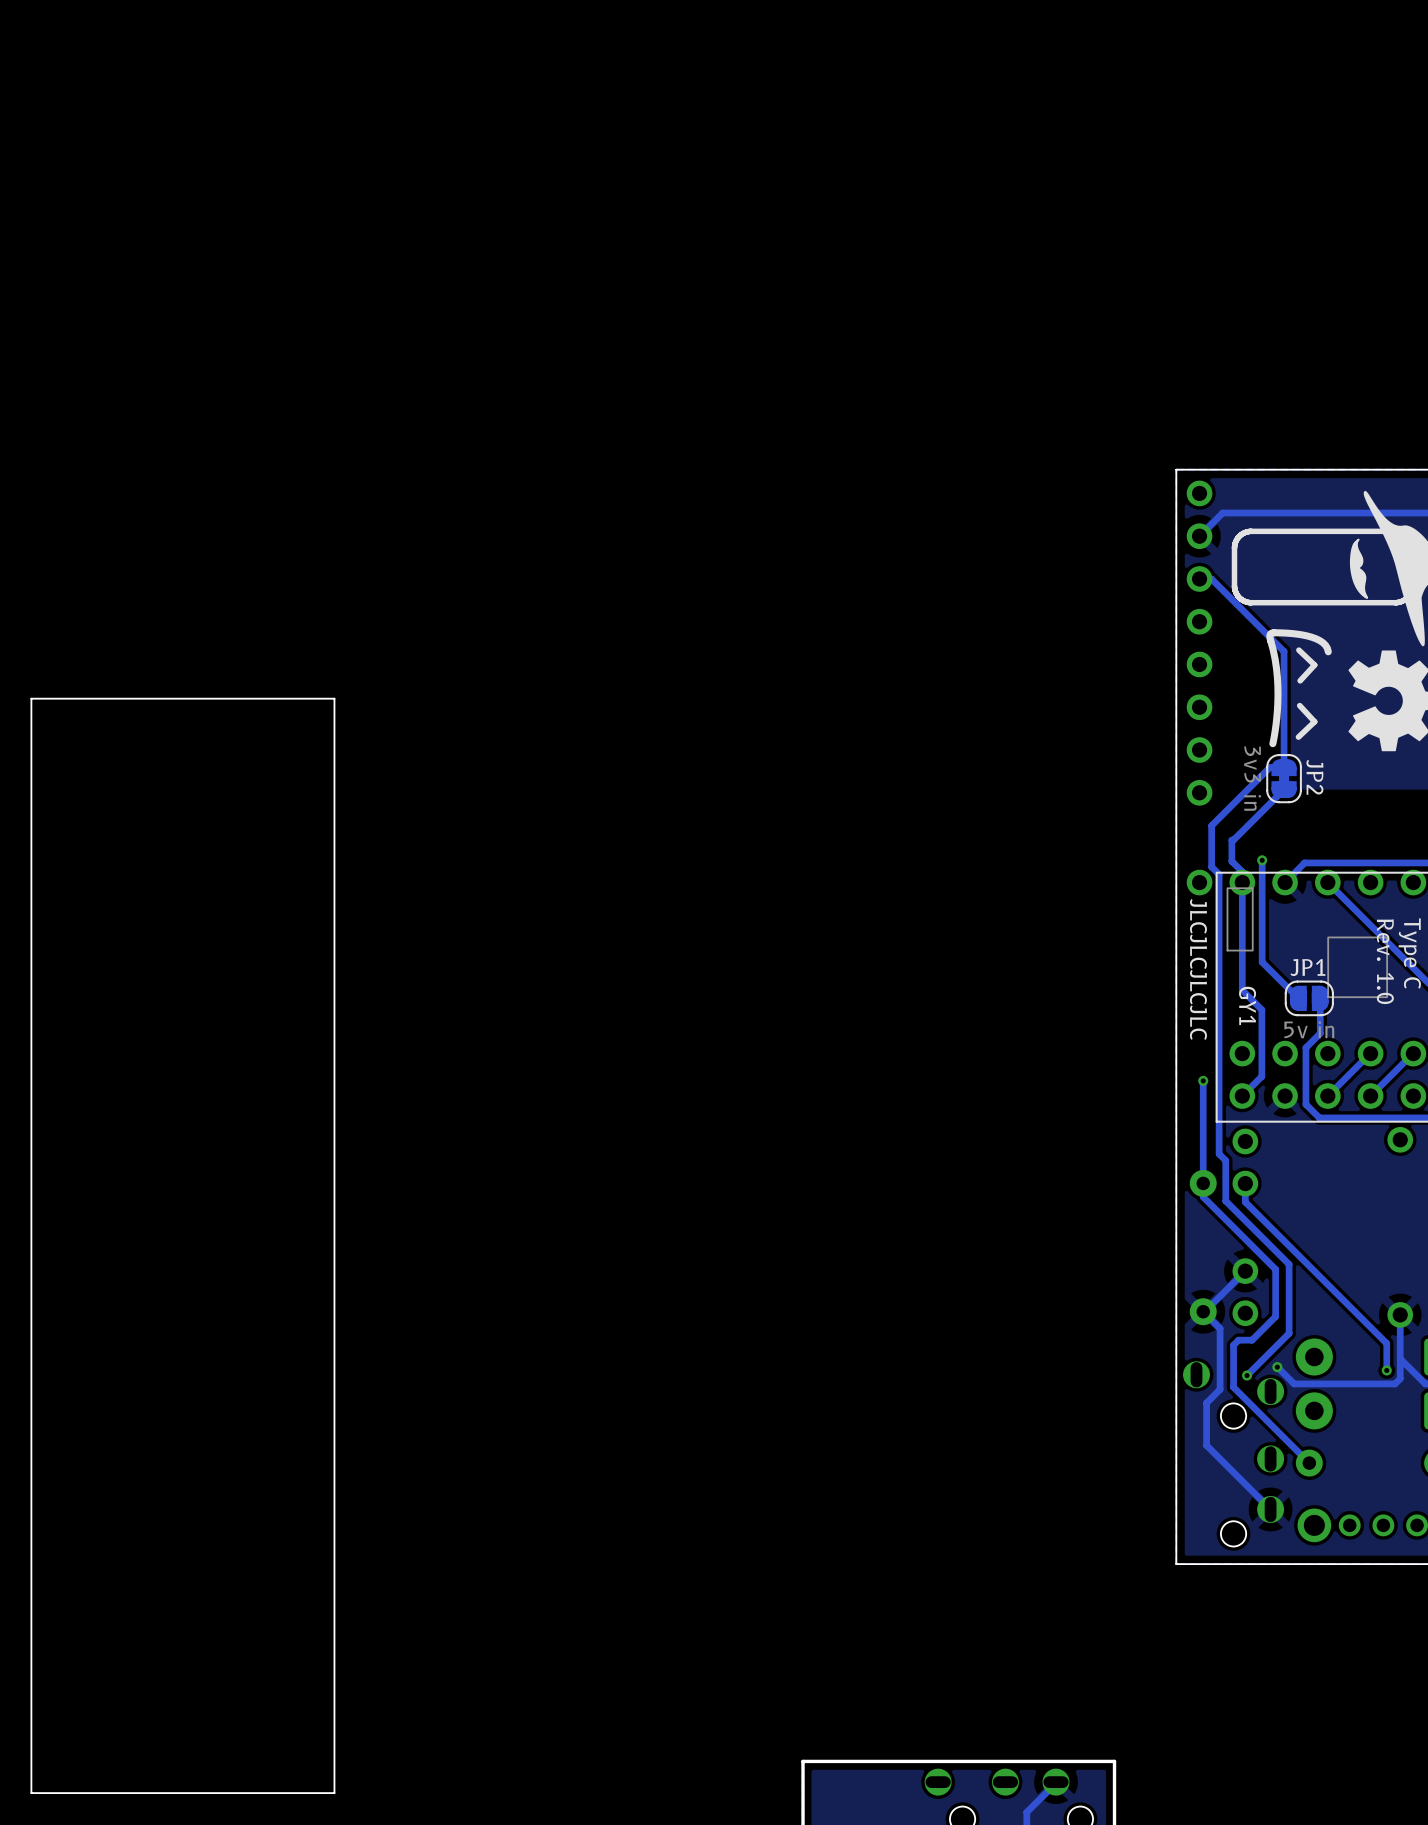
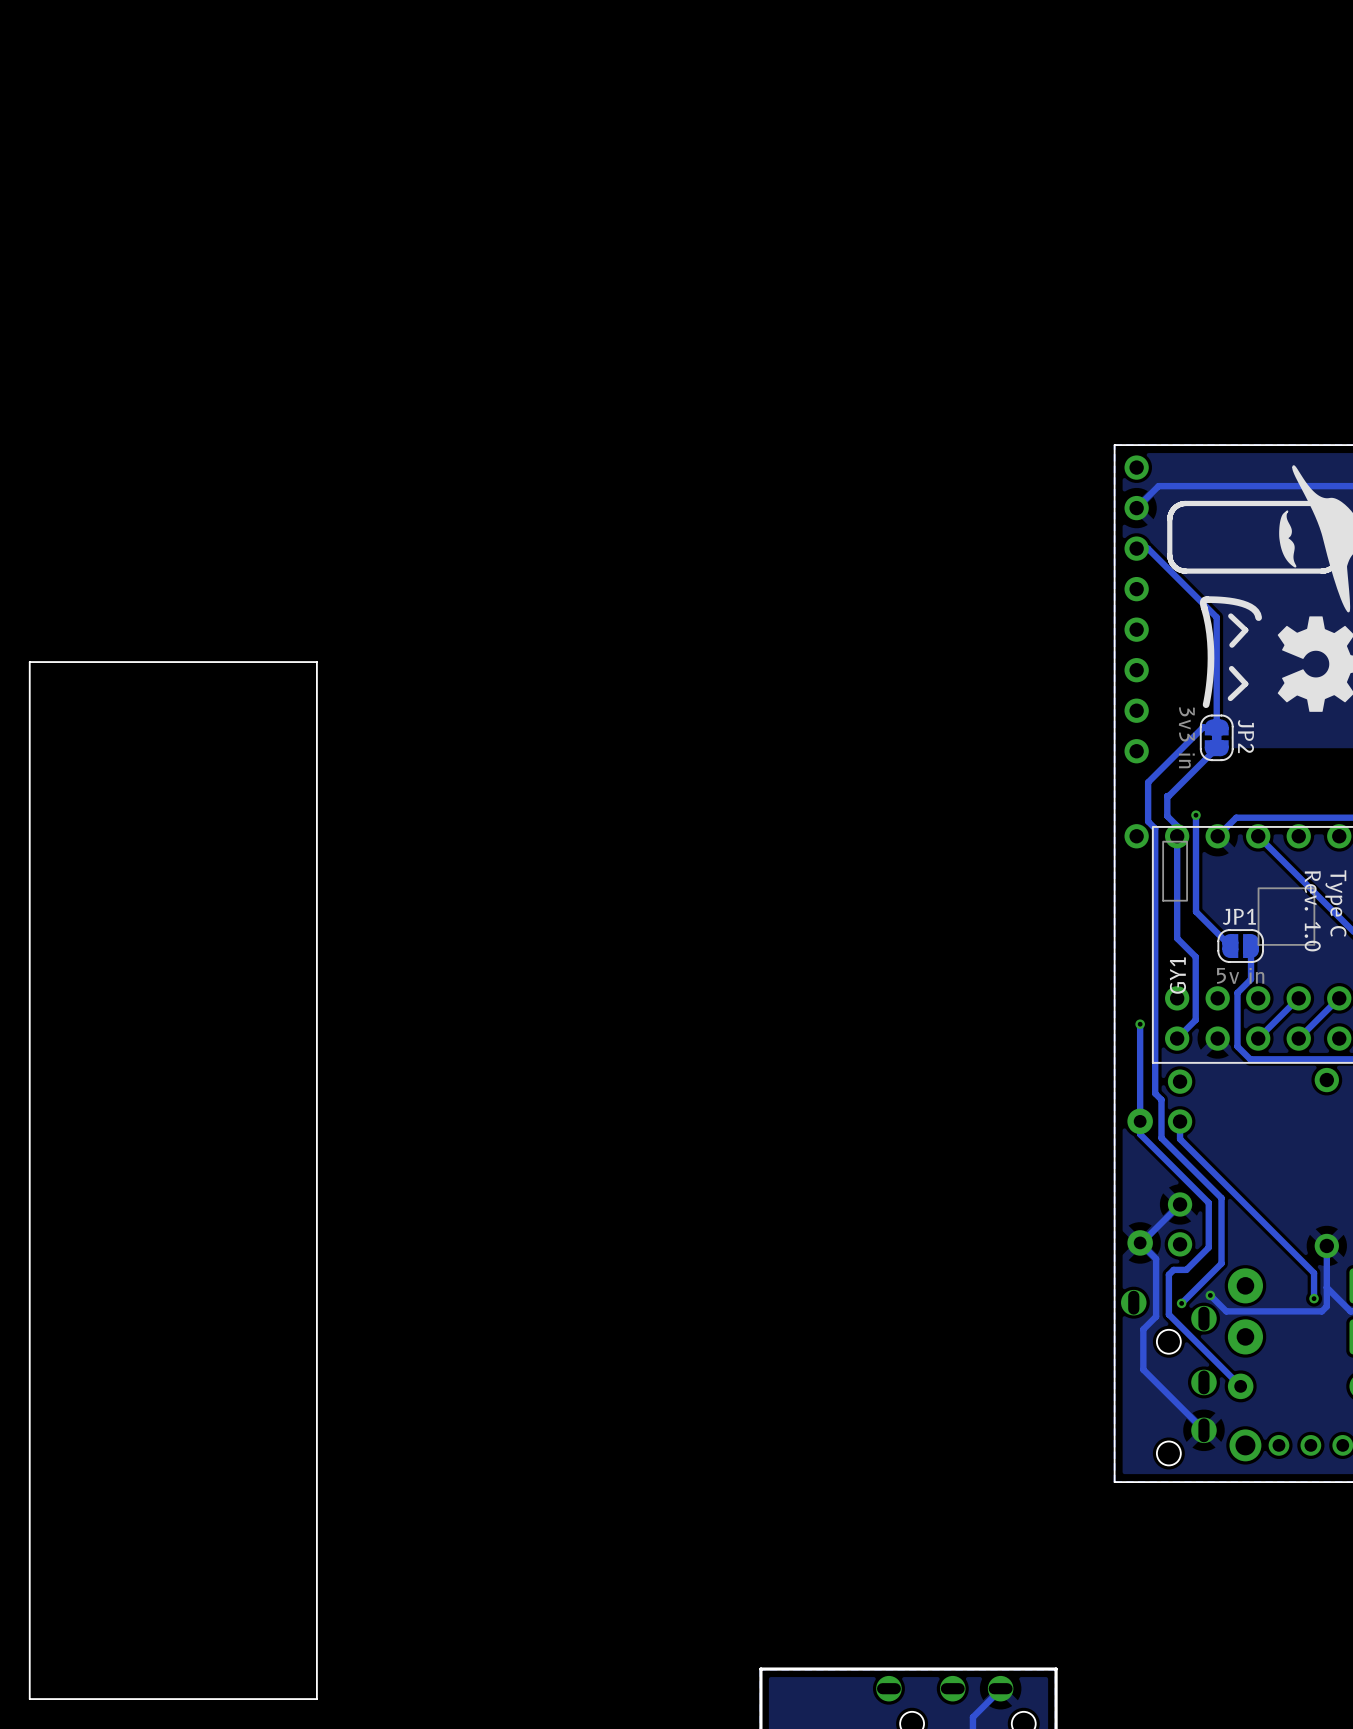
text: JLCJLCJLCJLC (1198, 969) -> none
GY1 name rotation: 0° (1247, 1005) -> 180° (1177, 975)

